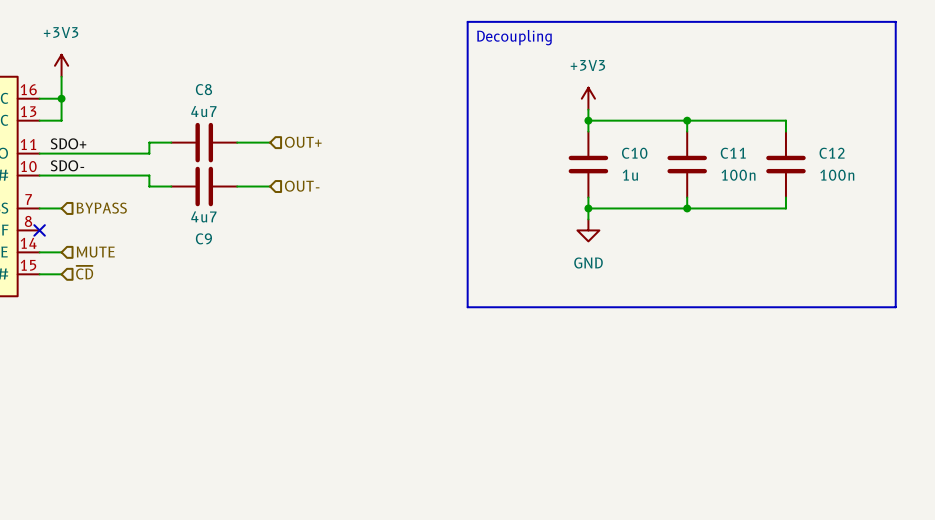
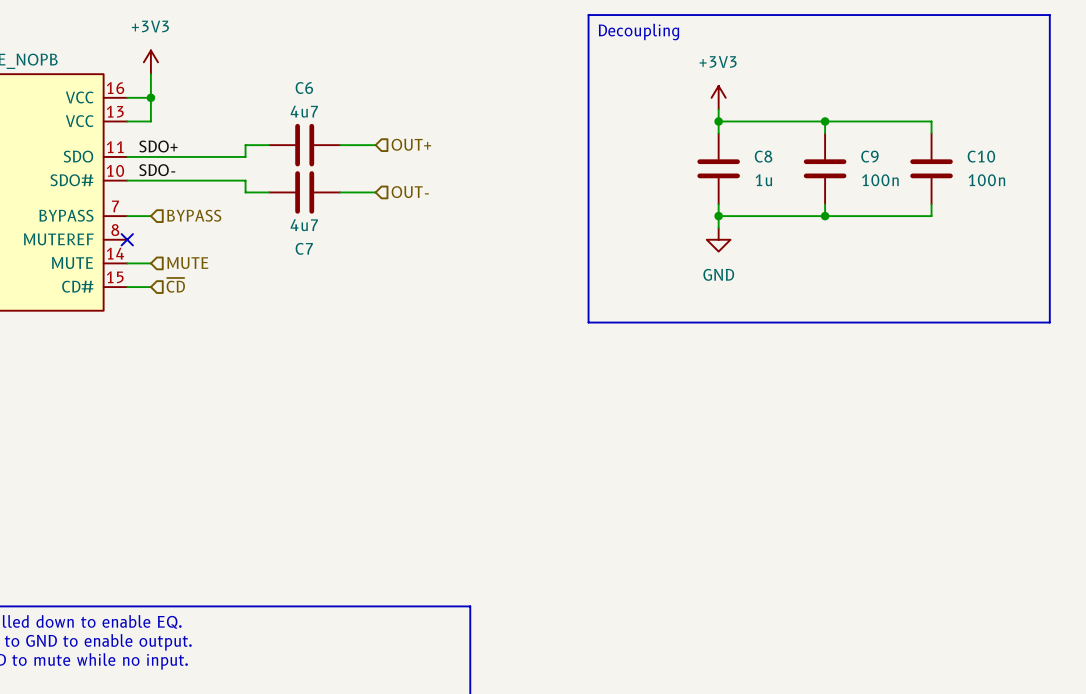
C8 name: C8 (203, 89) -> C6 (304, 88)
C10 name: C10 (634, 153) -> C8 (763, 156)
C11 name: C11 (733, 153) -> C9 (869, 156)
C12 name: C12 (832, 153) -> C10 (981, 156)
C9 name: C9 (203, 238) -> C7 (304, 248)

